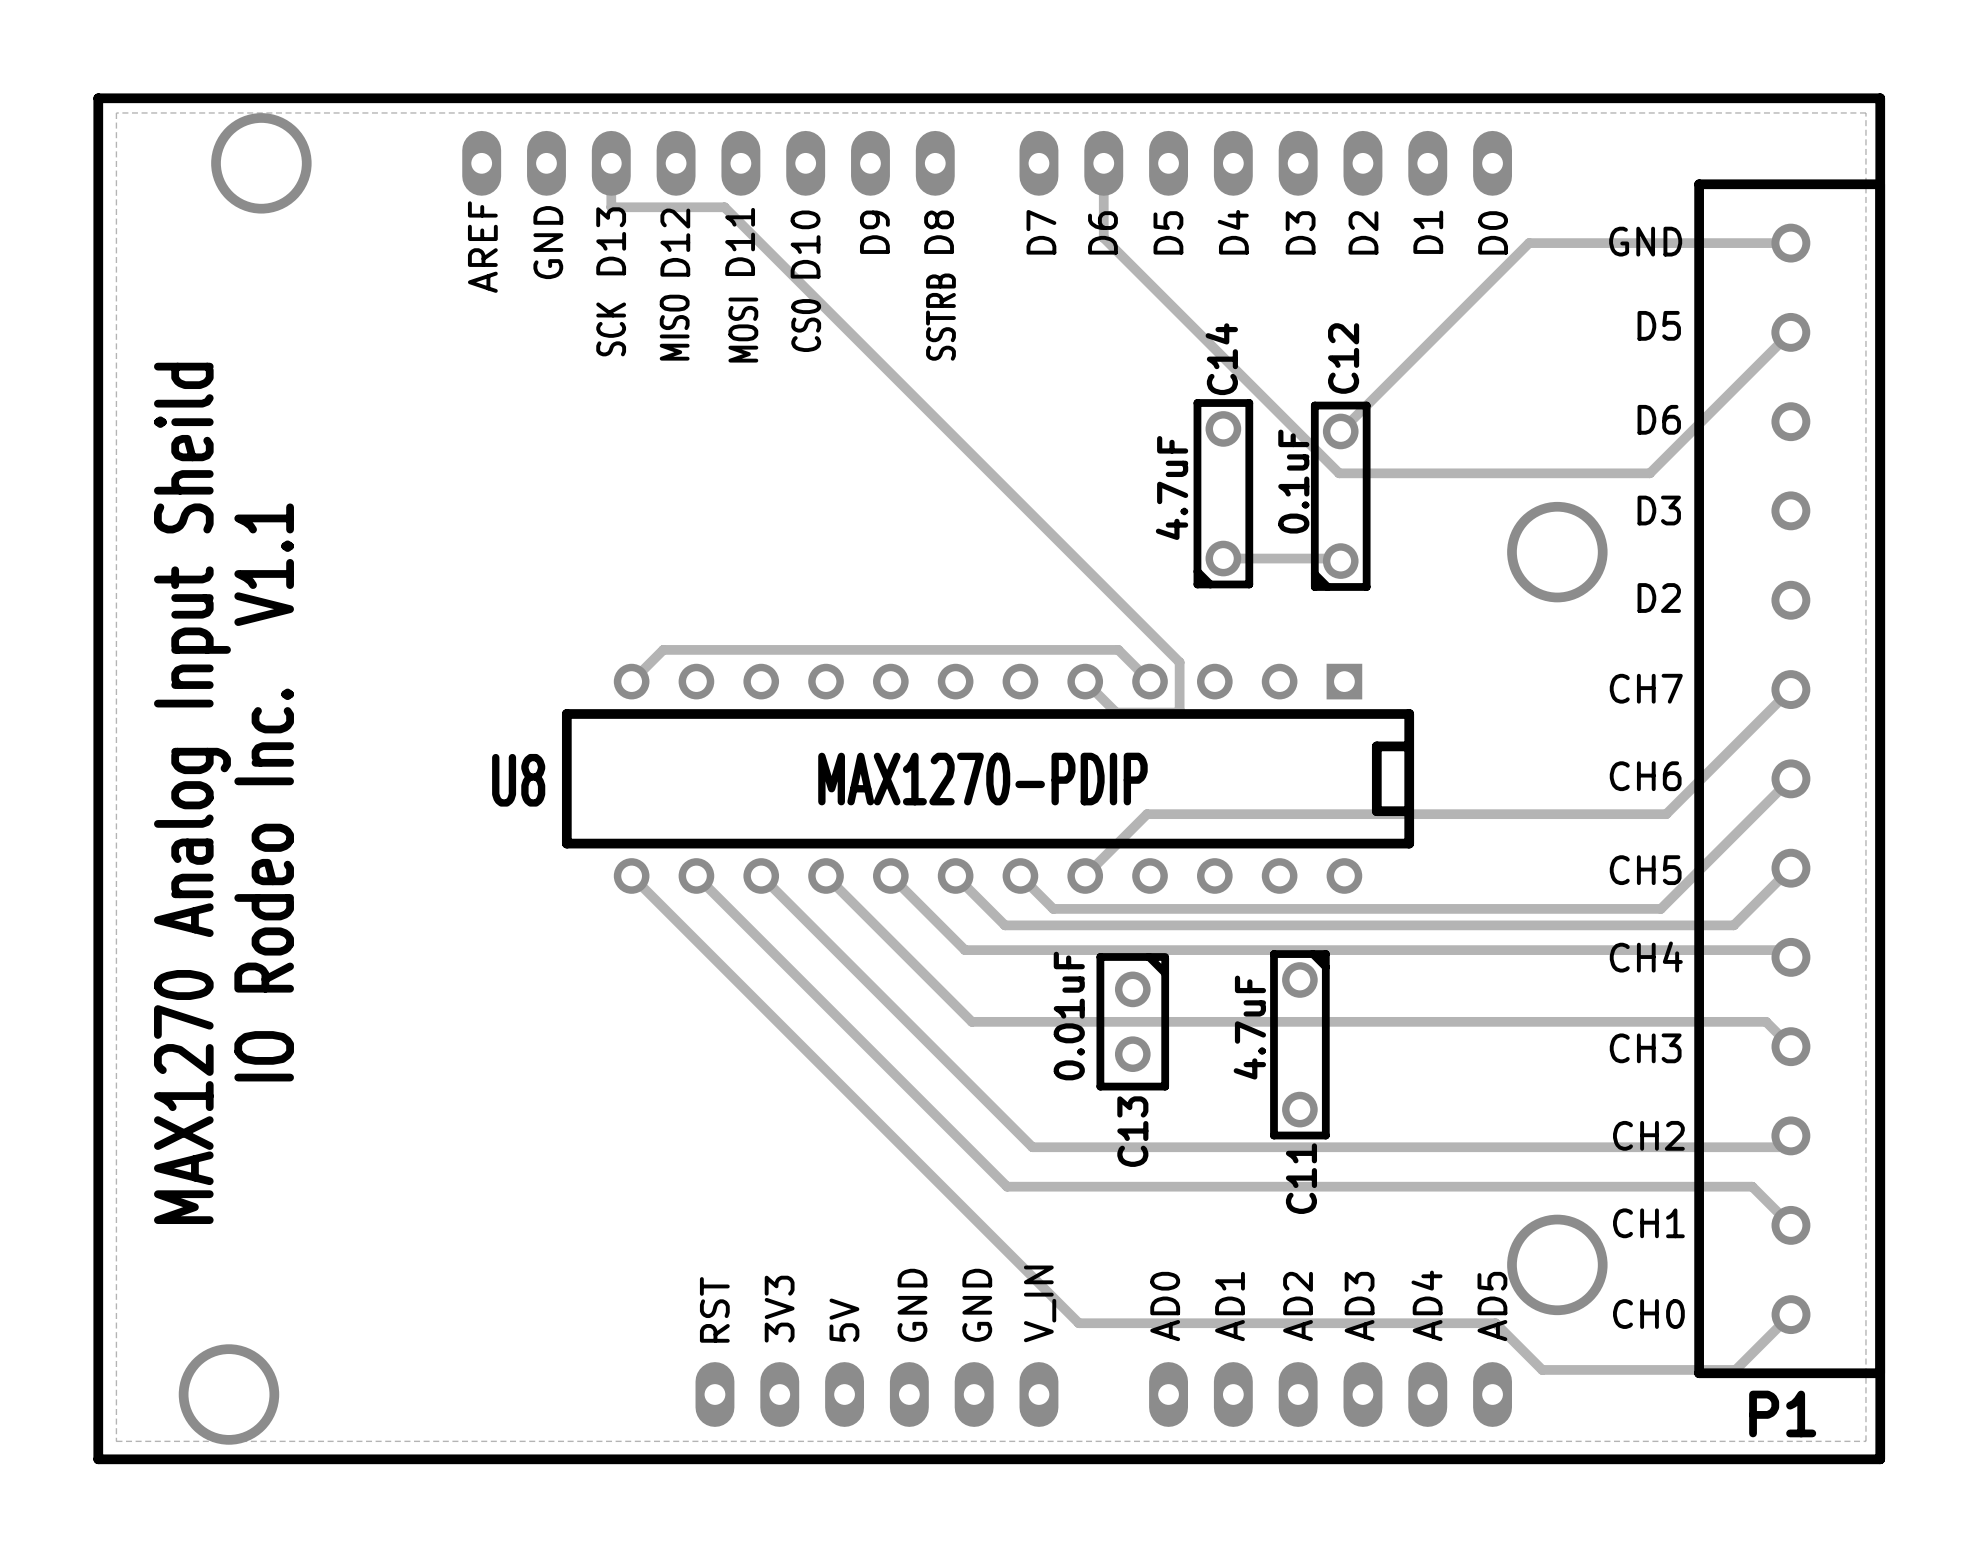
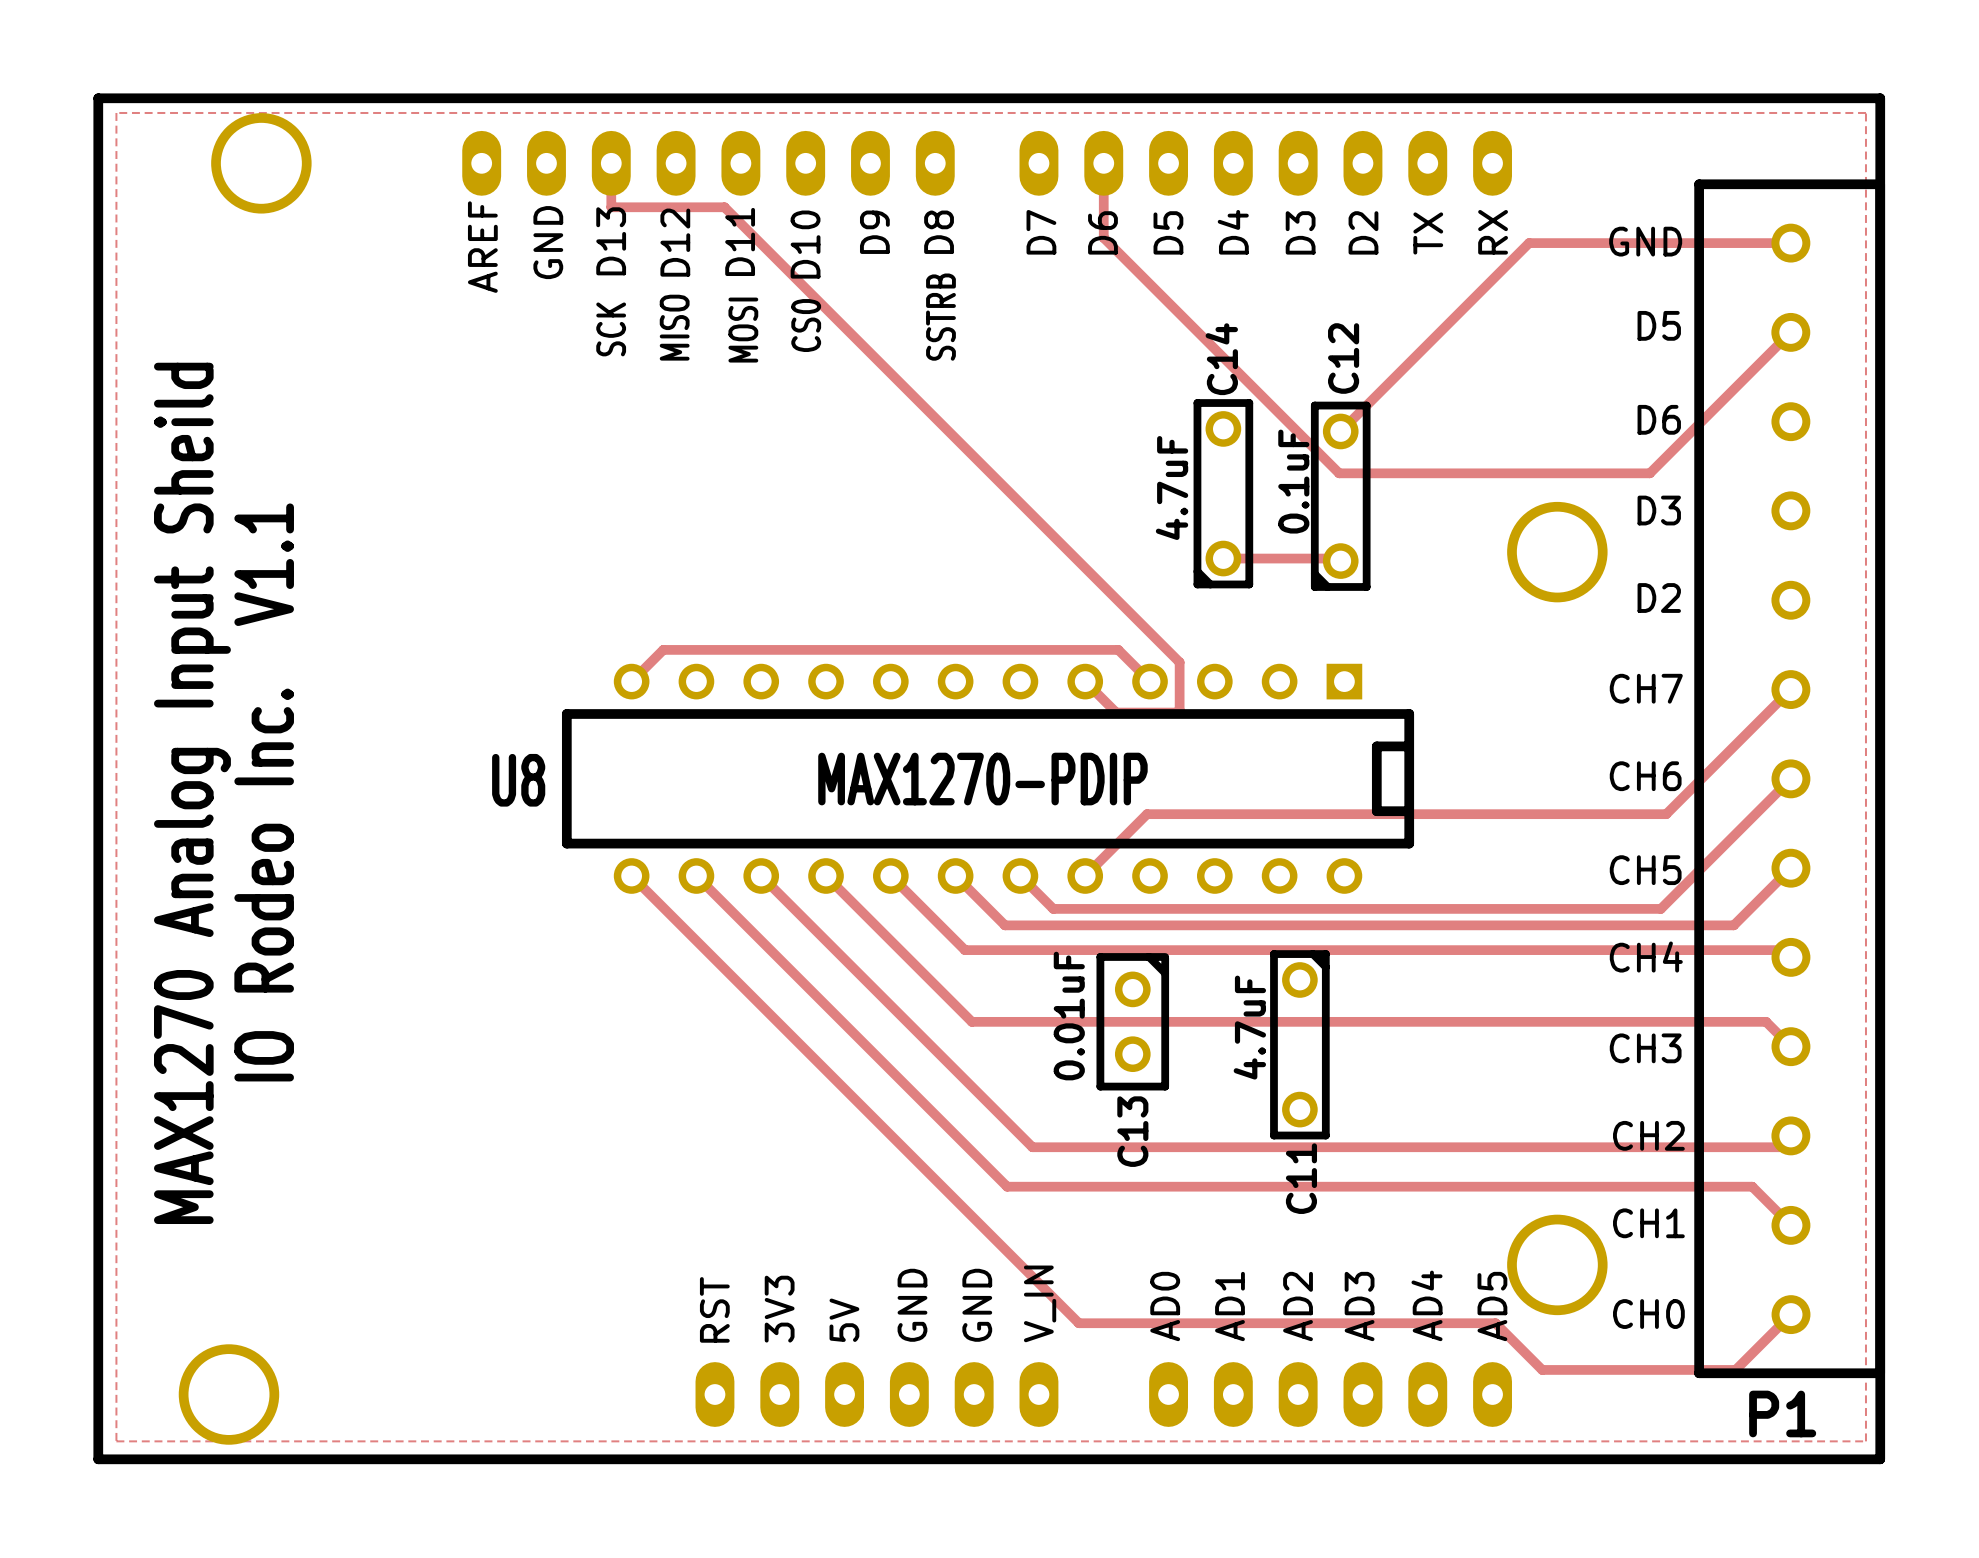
text: D1 (1428, 232) -> TX (1428, 233)
text: D0 (1493, 232) -> RX (1493, 232)

